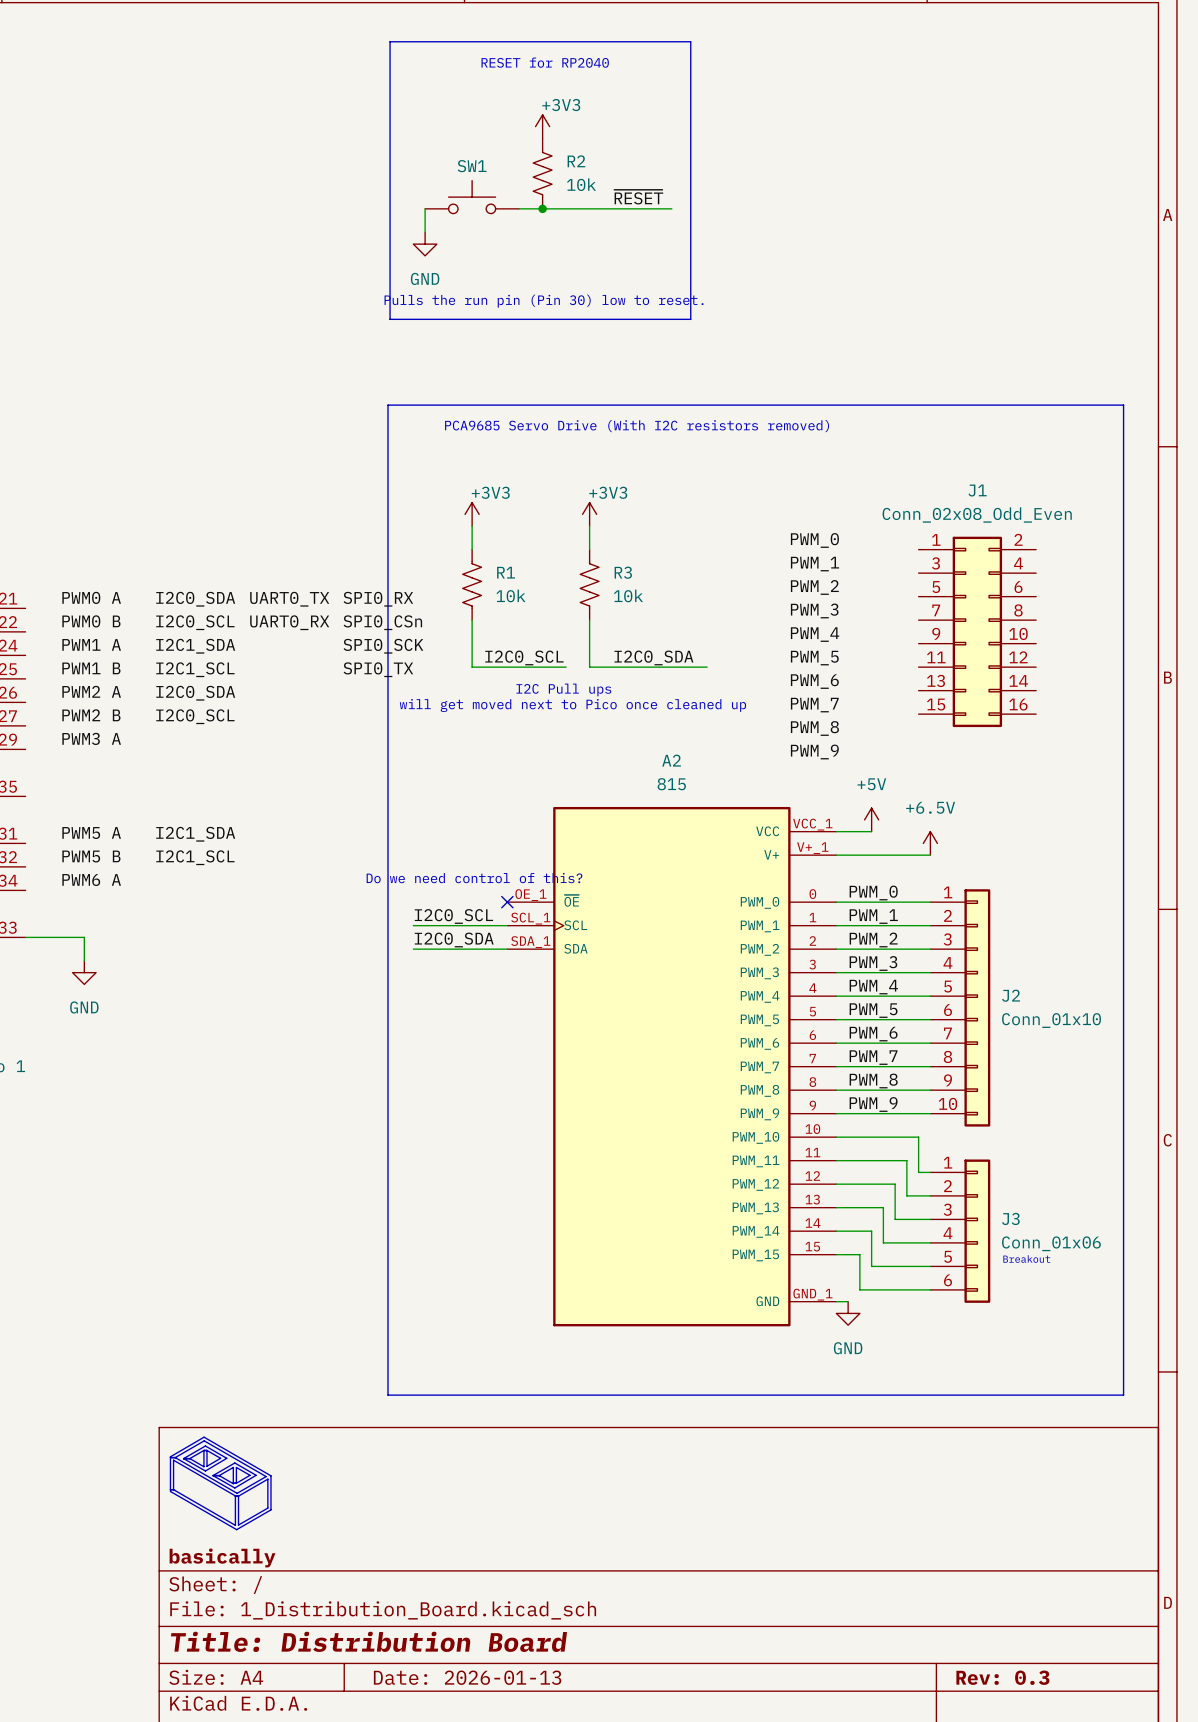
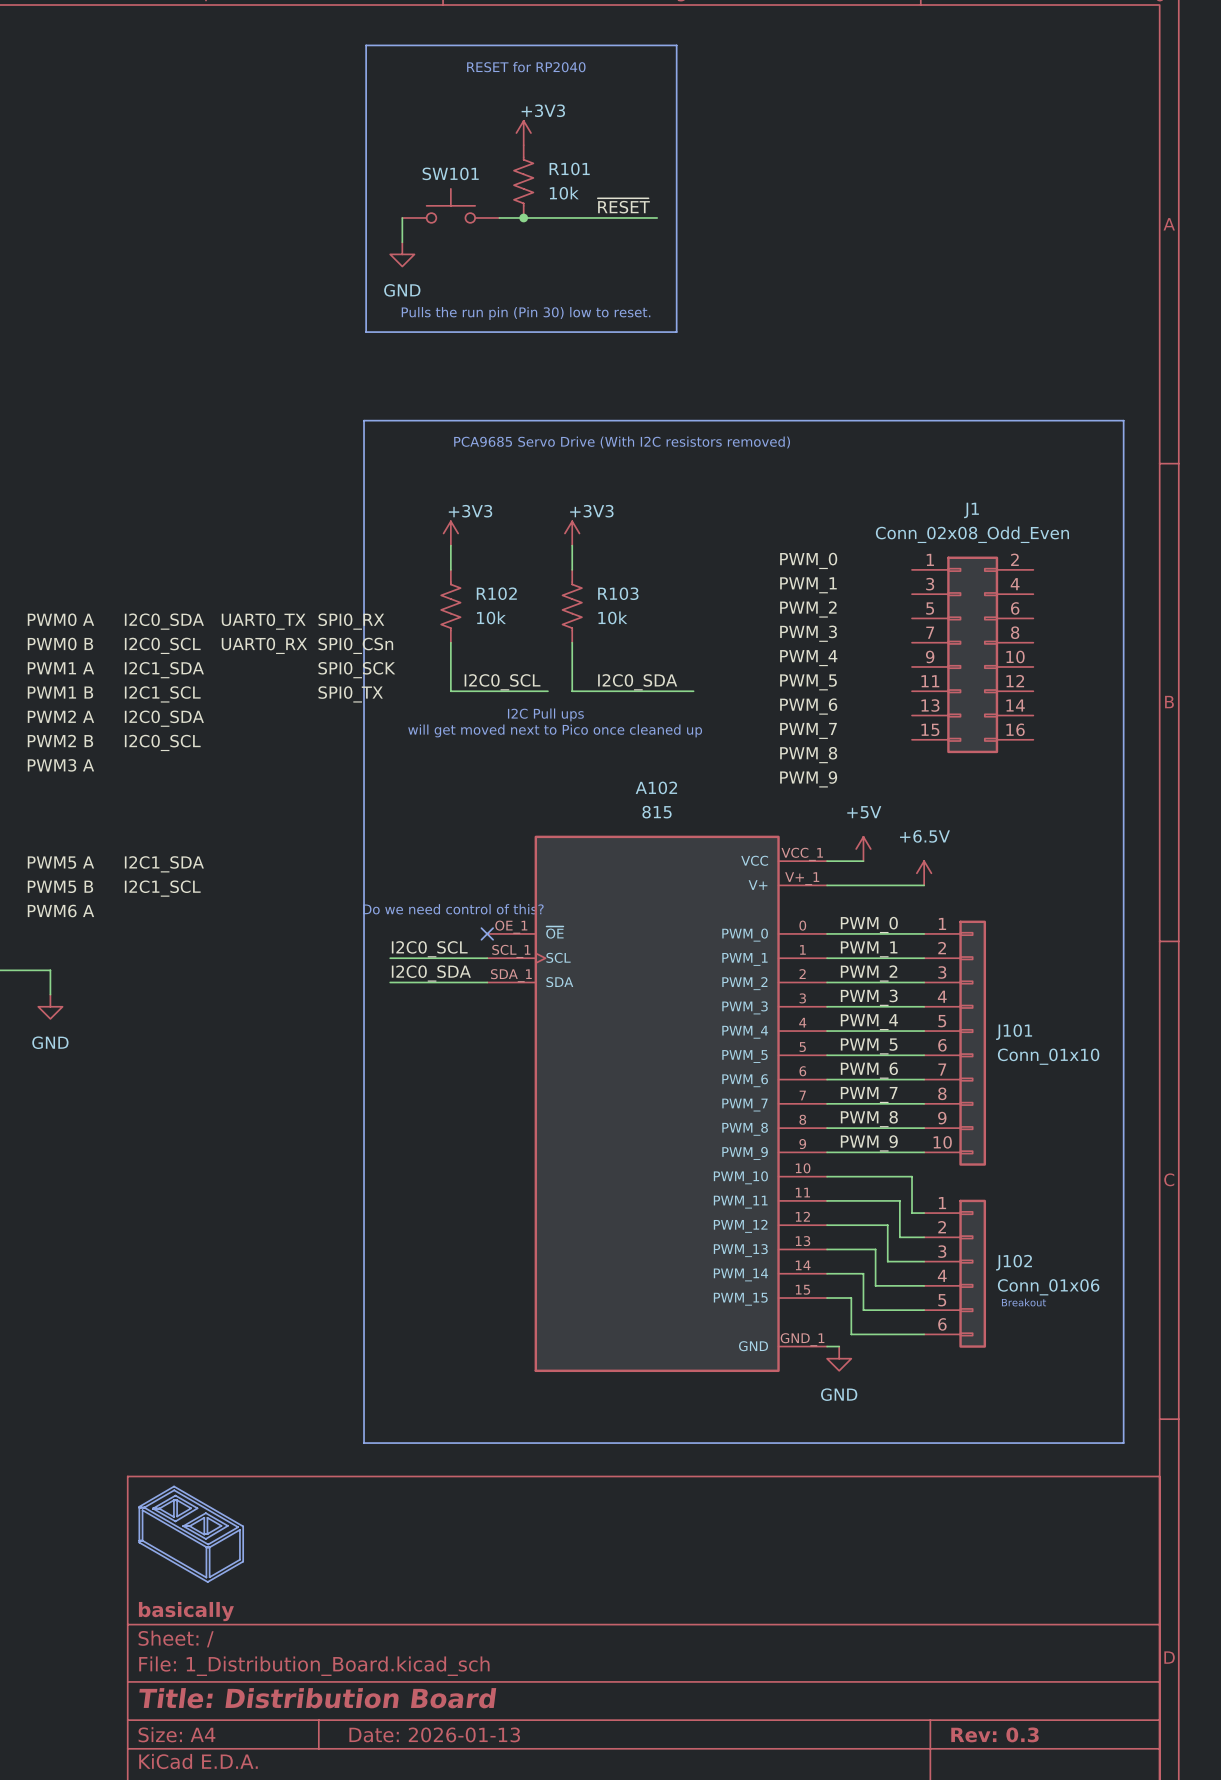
R2 name: R2 (576, 161) -> R101 (569, 169)
SW1 name: SW1 (472, 166) -> SW101 (450, 173)
R1 name: R1 (506, 572) -> R102 (496, 593)
R3 name: R3 (623, 572) -> R103 (618, 593)
A2 name: A2 (671, 760) -> A102 (656, 787)
J2 name: J2 (1011, 995) -> J101 (1014, 1032)
J3 name: J3 (1010, 1218) -> J102 (1014, 1262)

